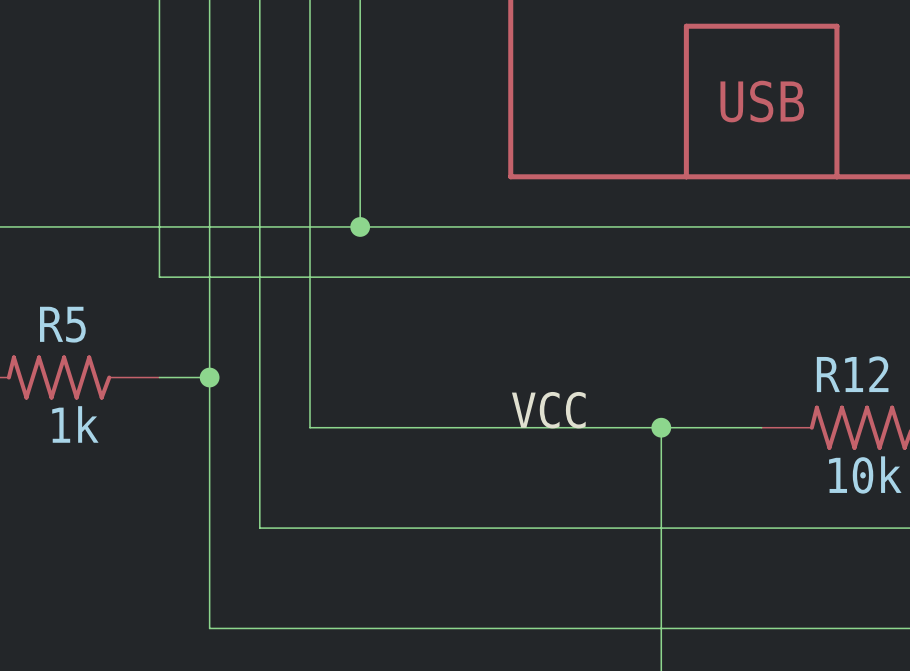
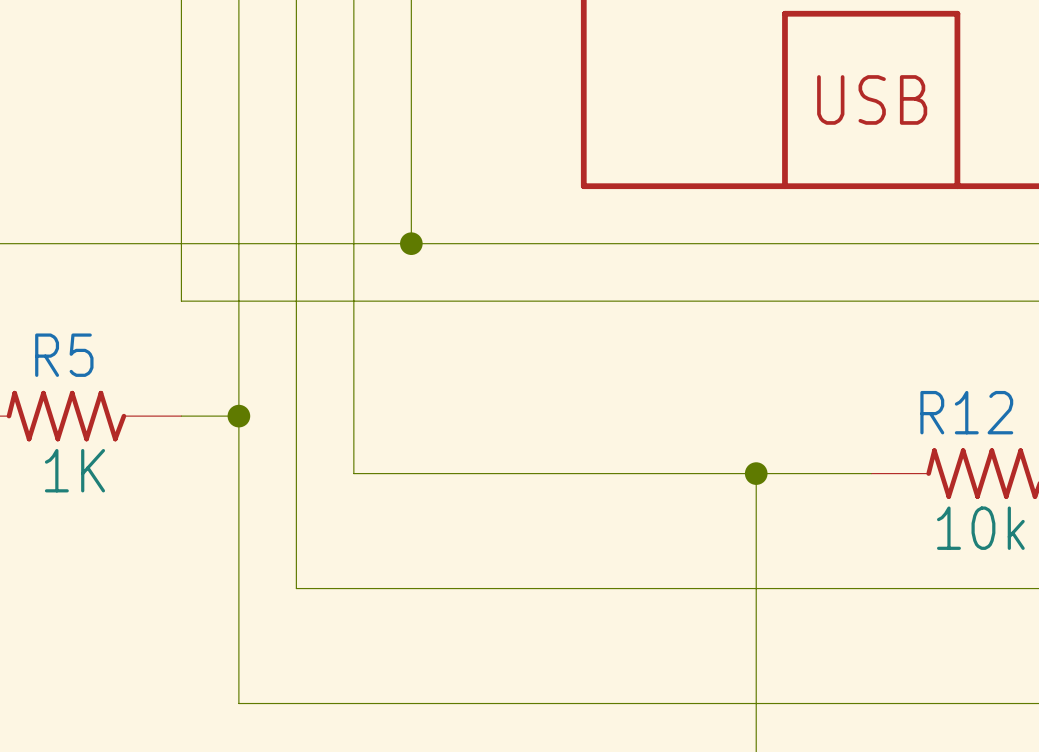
label: VCC (548, 410) -> none
R5 value: 1k (75, 424) -> 1K (74, 470)

